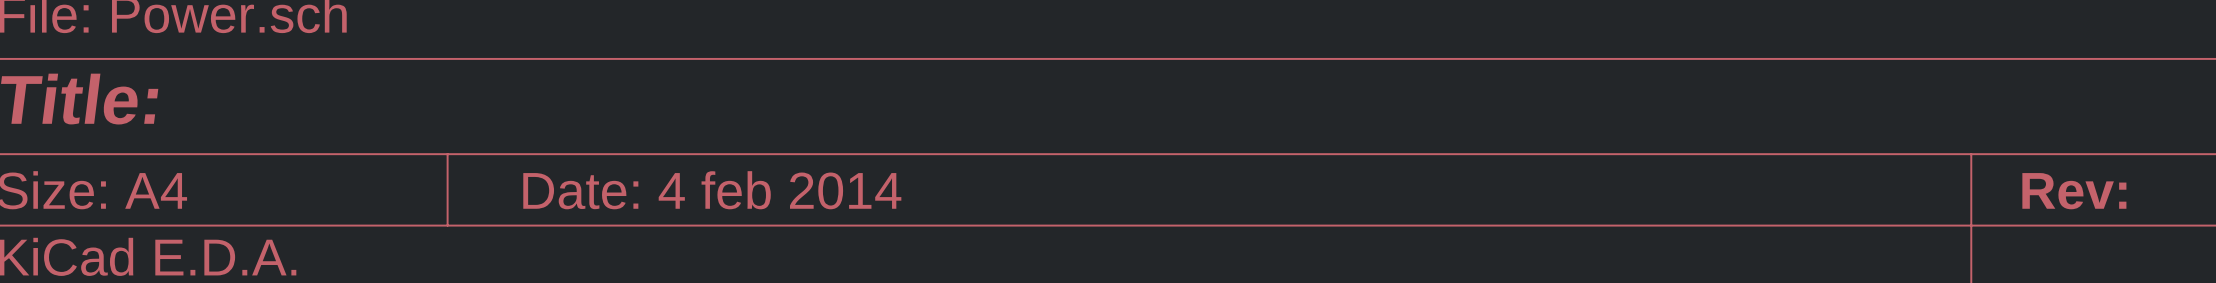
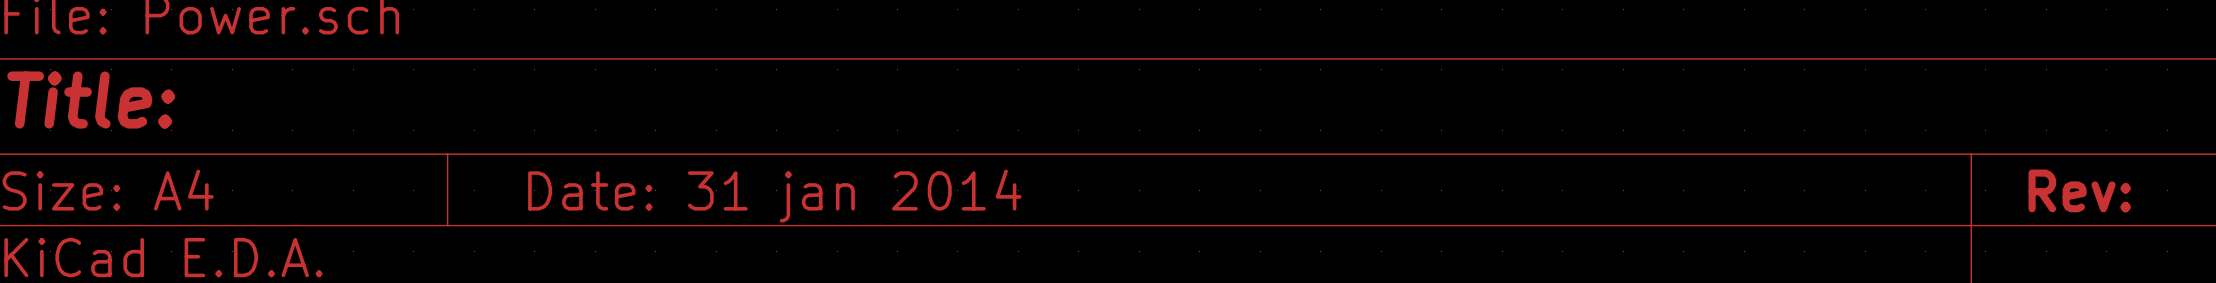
title block: Date: 4 feb 2014 (712, 190) -> Date: 31 jan 2014 (774, 196)

